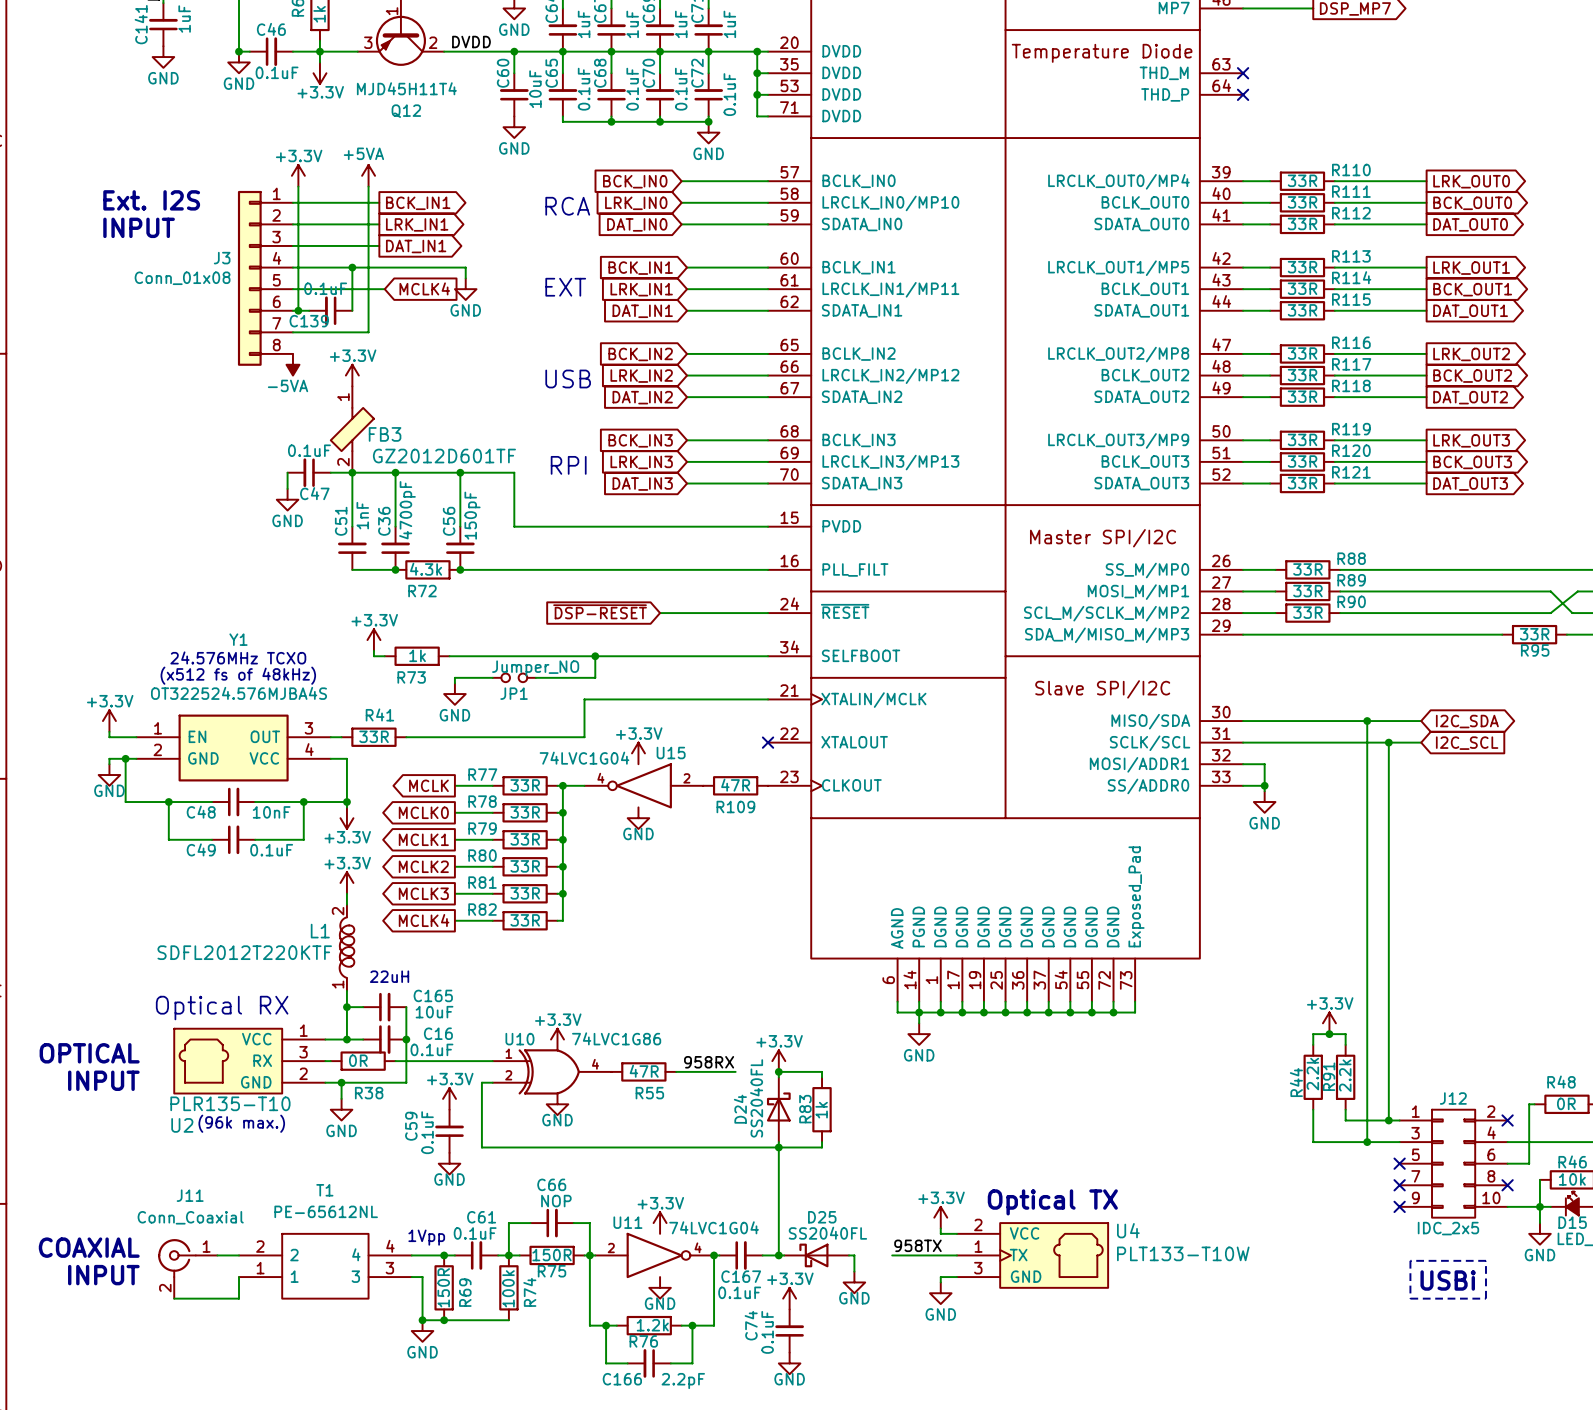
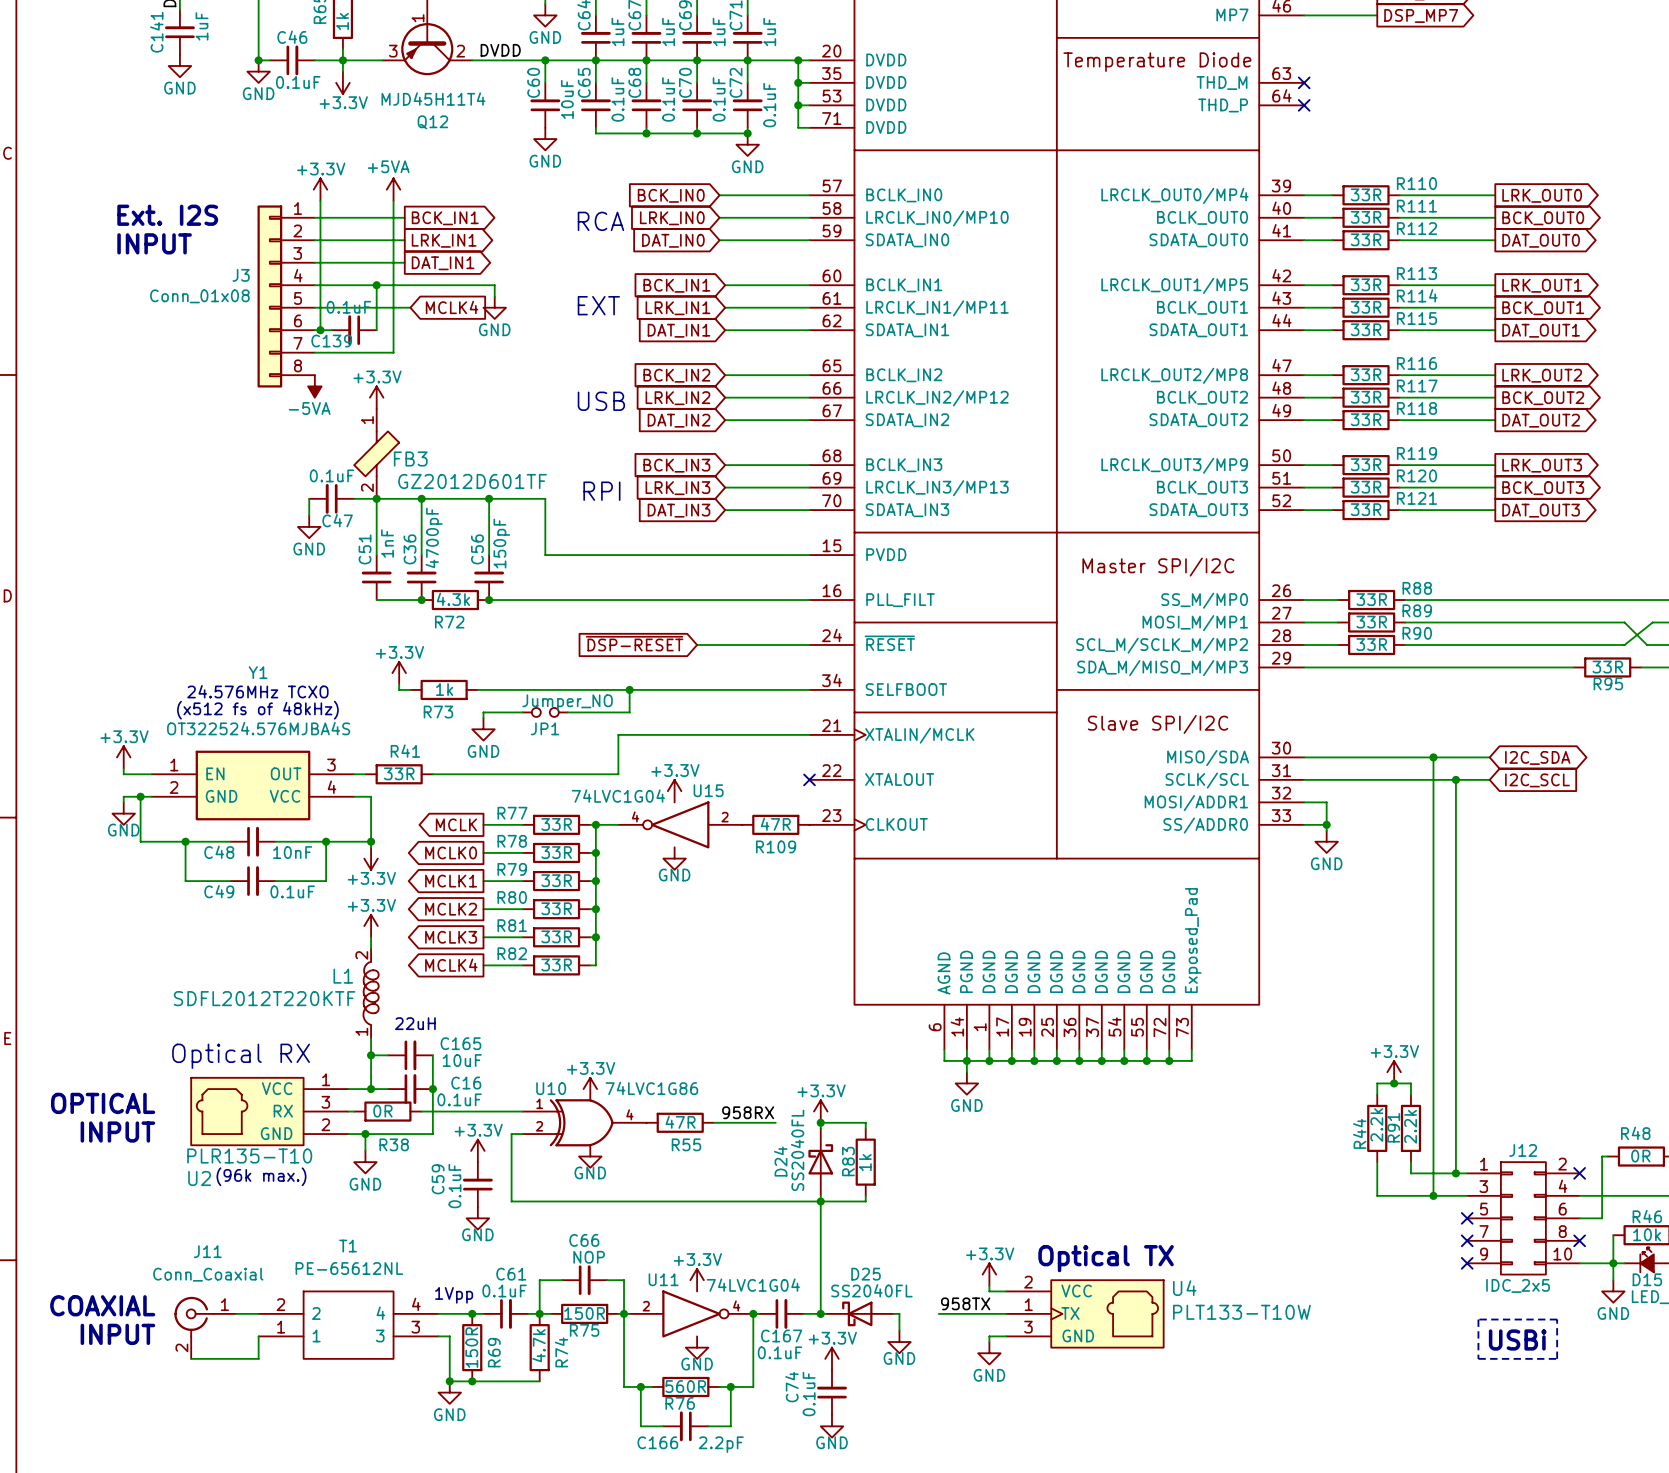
R74 value: 100k (508, 1288) -> 4.7k (539, 1345)
R76 value: 1.2k (652, 1325) -> 560R (685, 1386)

